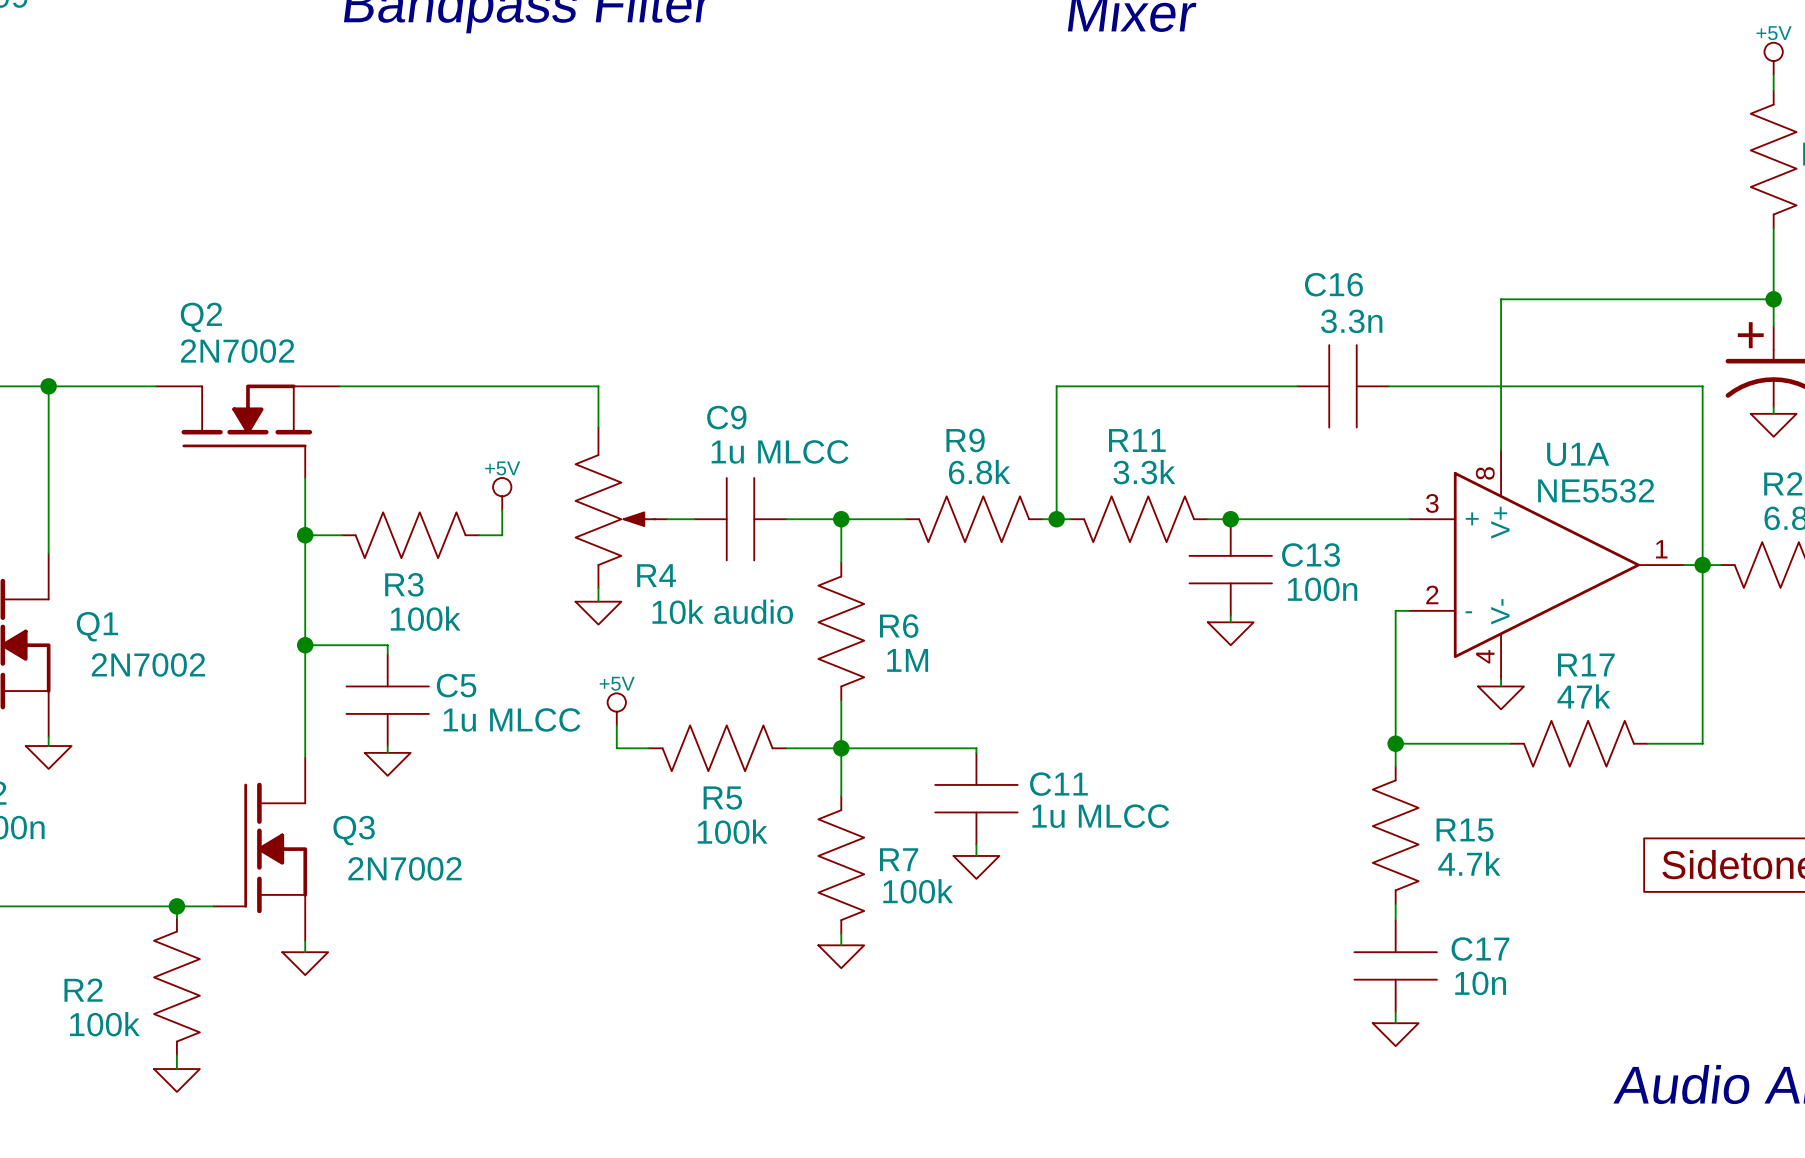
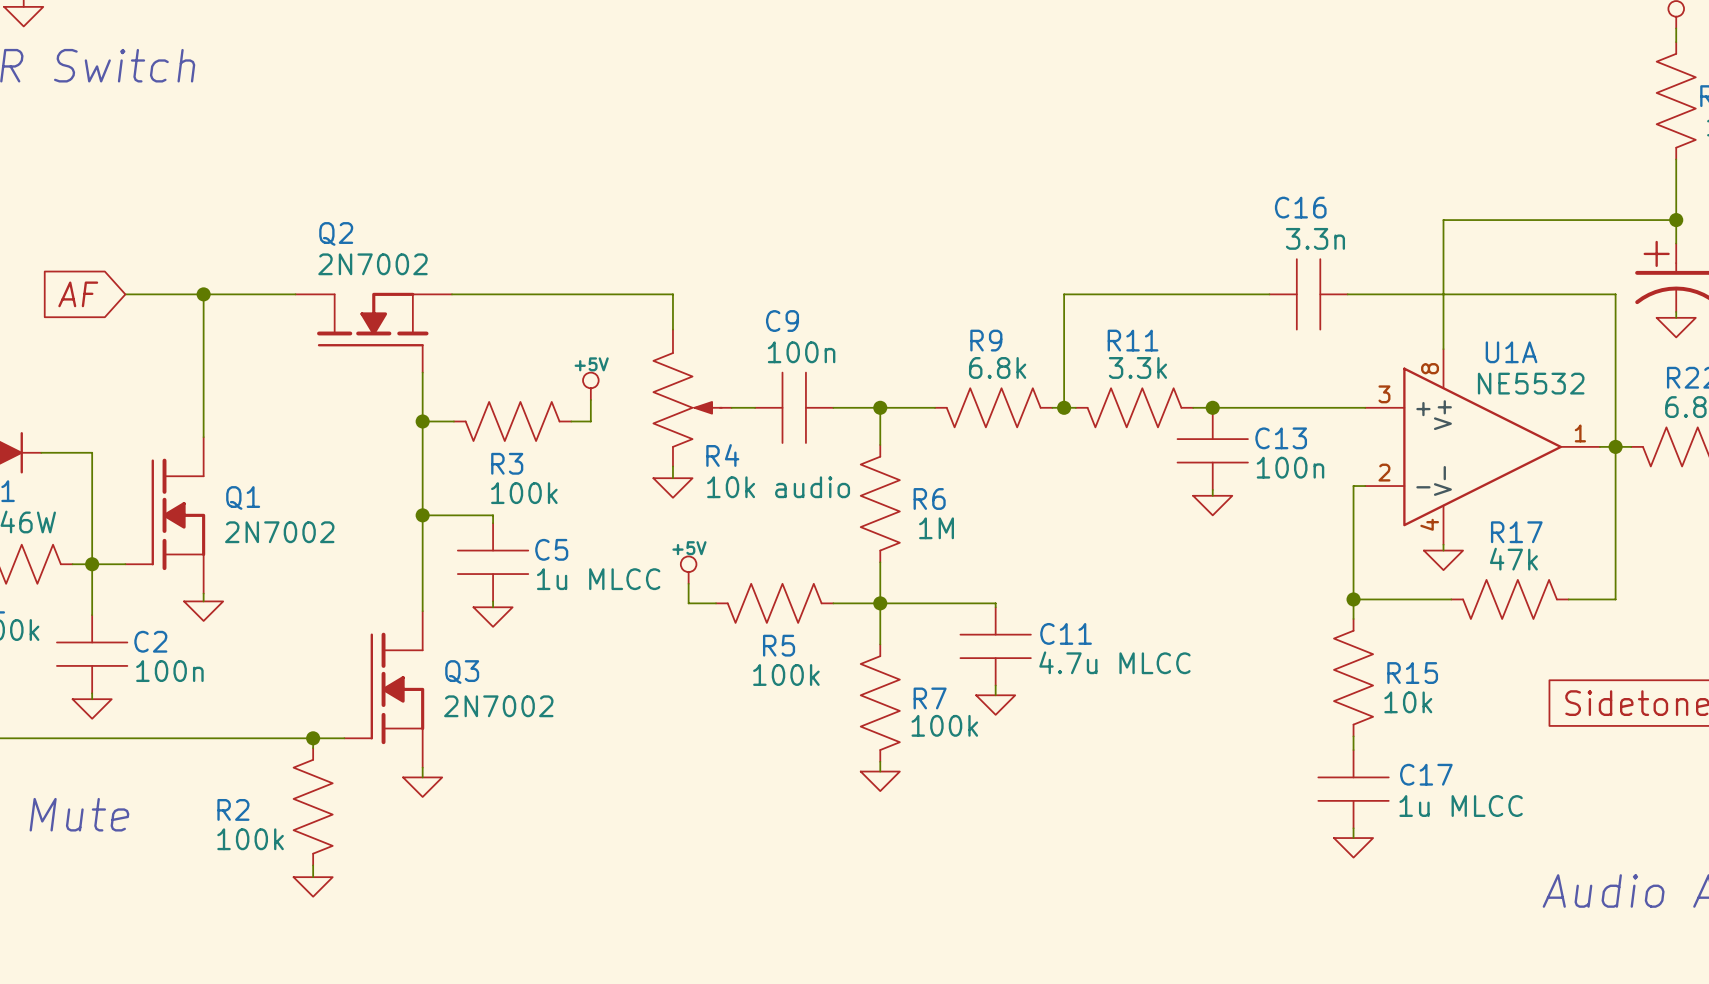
C9 value: 1u MLCC (780, 451) -> 100n (801, 352)
C11 value: 1u MLCC (1100, 816) -> 4.7u MLCC (1114, 662)
R15 value: 4.7k (1469, 863) -> 10k (1408, 702)
C17 value: 10n (1480, 983) -> 1u MLCC (1461, 806)

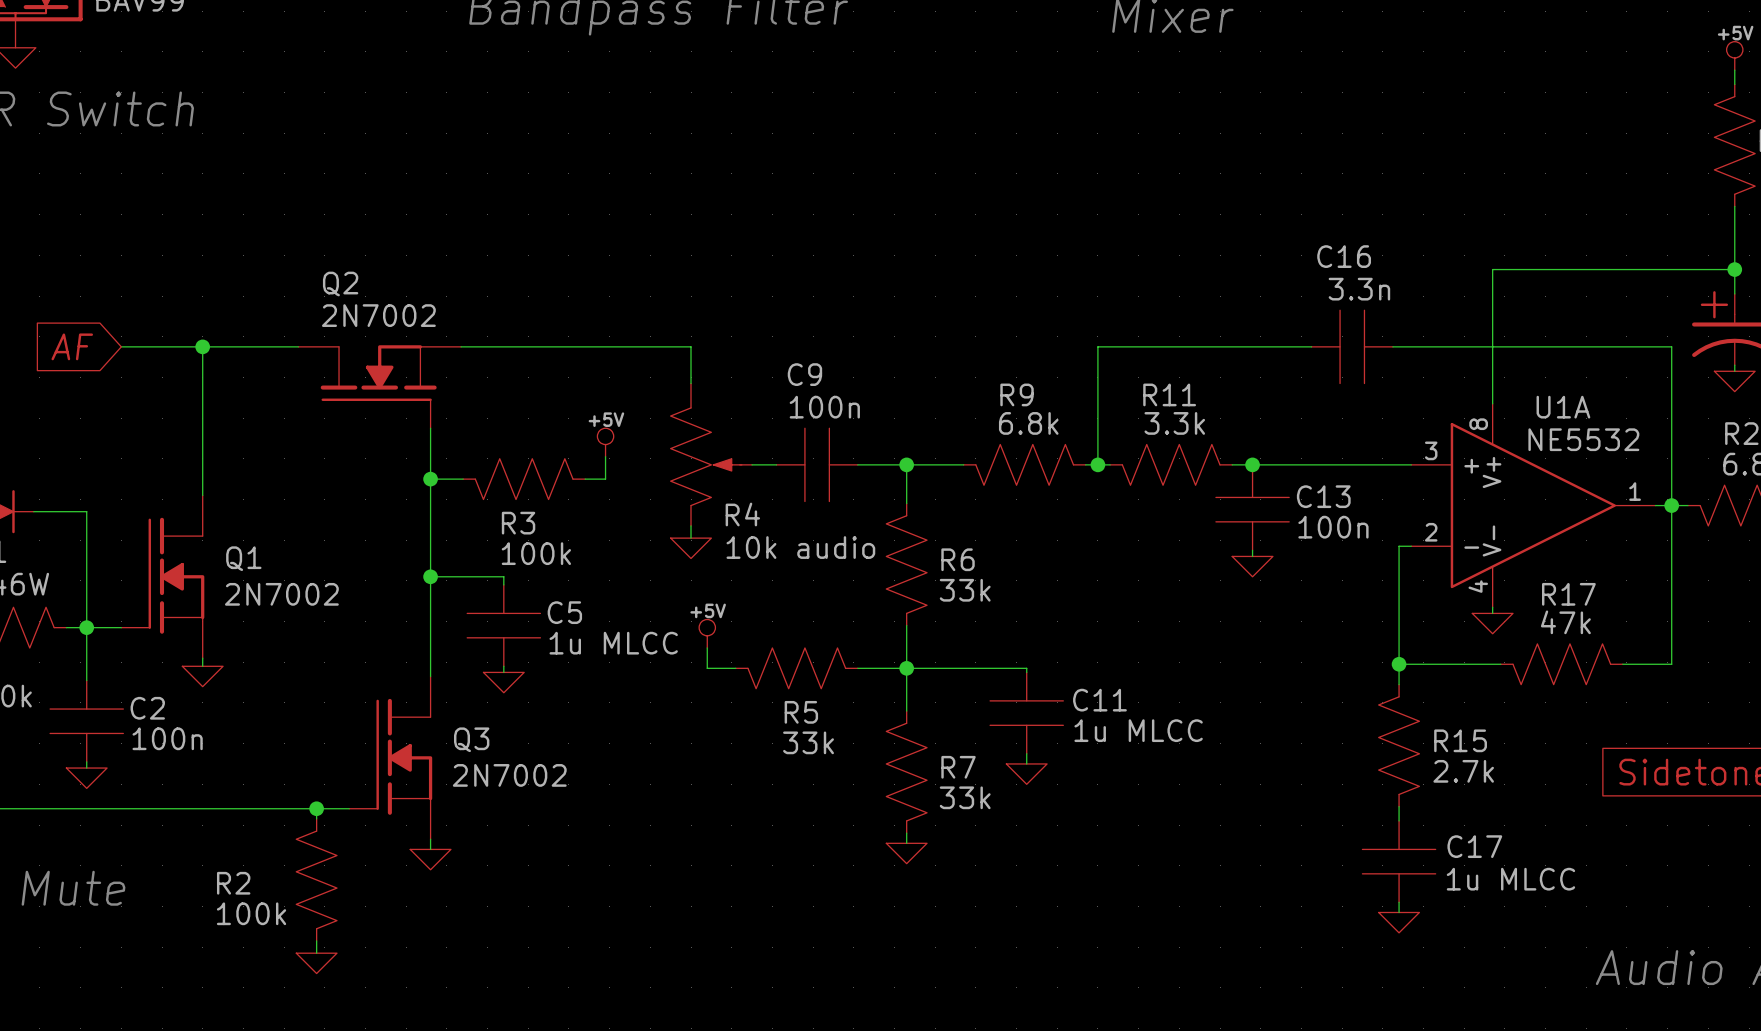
R6 value: 1M (936, 528) -> 33k (965, 590)
C11 value: 4.7u MLCC (1114, 662) -> 1u MLCC (1138, 730)
R5 value: 100k (786, 674) -> 33k (808, 742)
R15 value: 10k (1408, 702) -> 2.7k (1463, 771)
R7 value: 100k (944, 725) -> 33k (965, 797)

